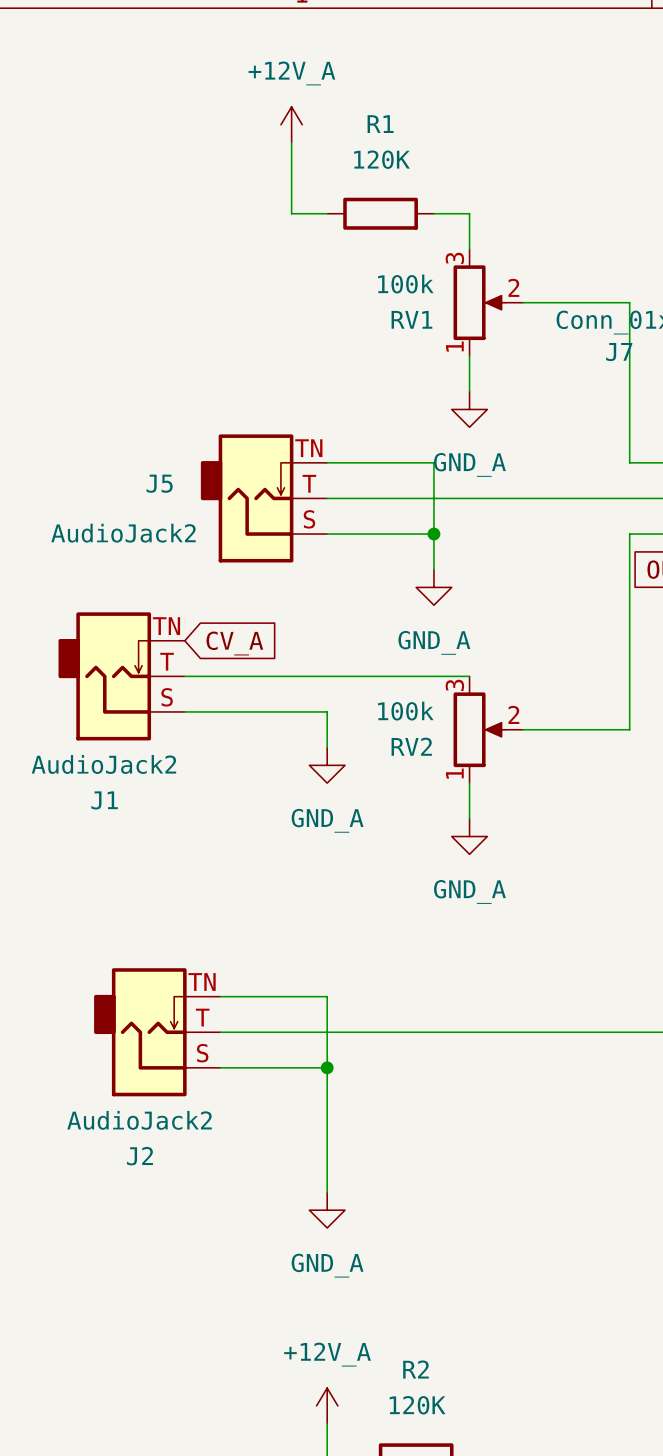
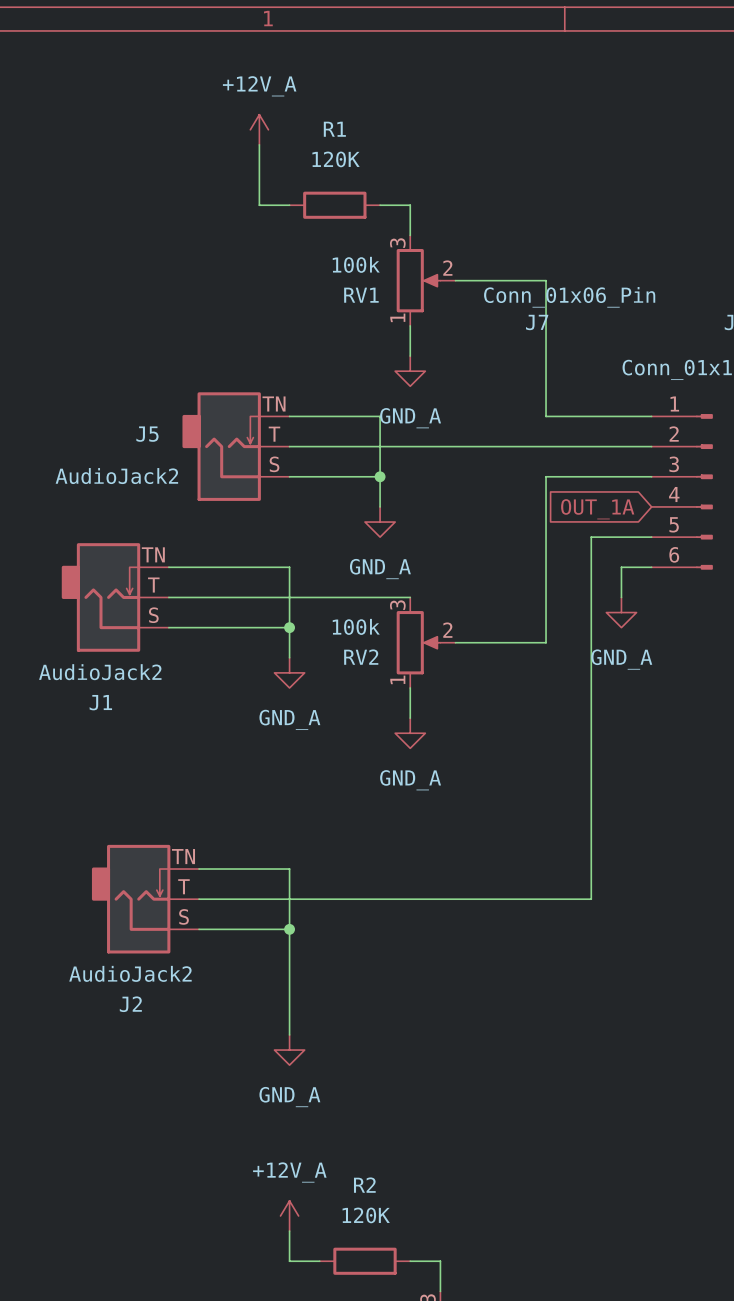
wire: none -> (168, 567) (289, 567) (289, 627)
global label: CV_A (234, 643) -> none
junction: none -> (289, 627)

